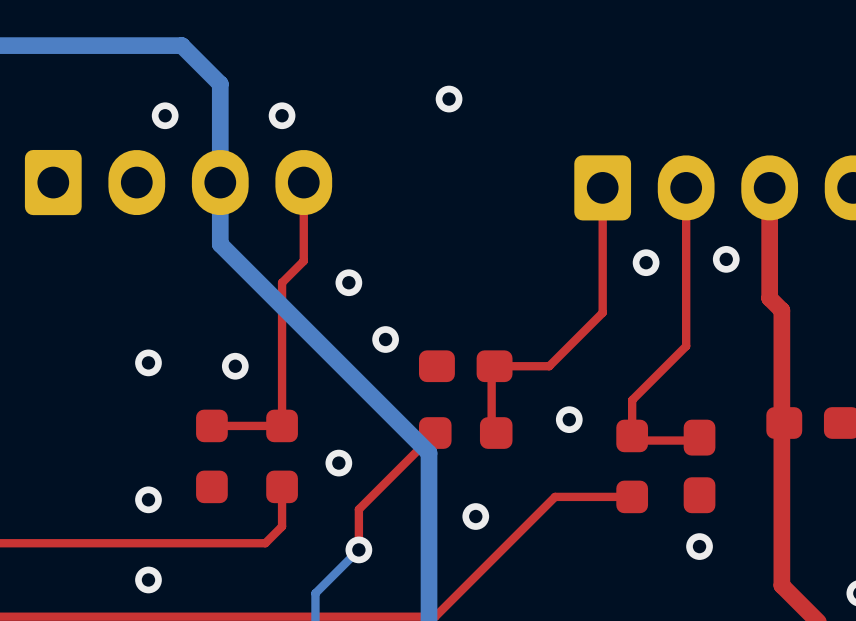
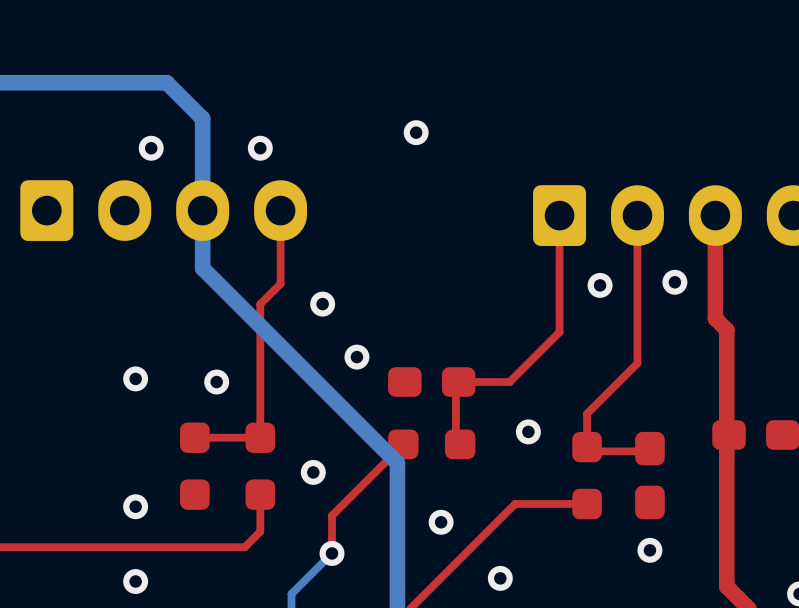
via: none -> (500, 578)

